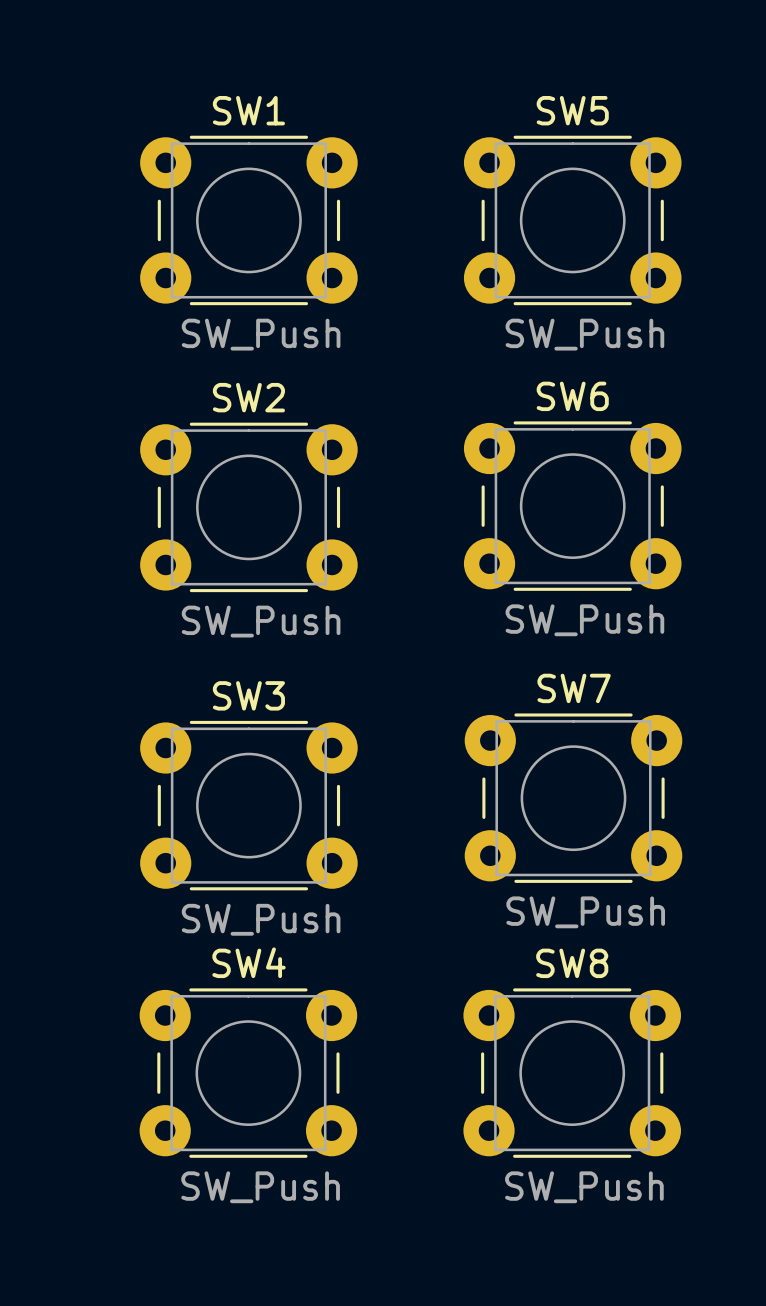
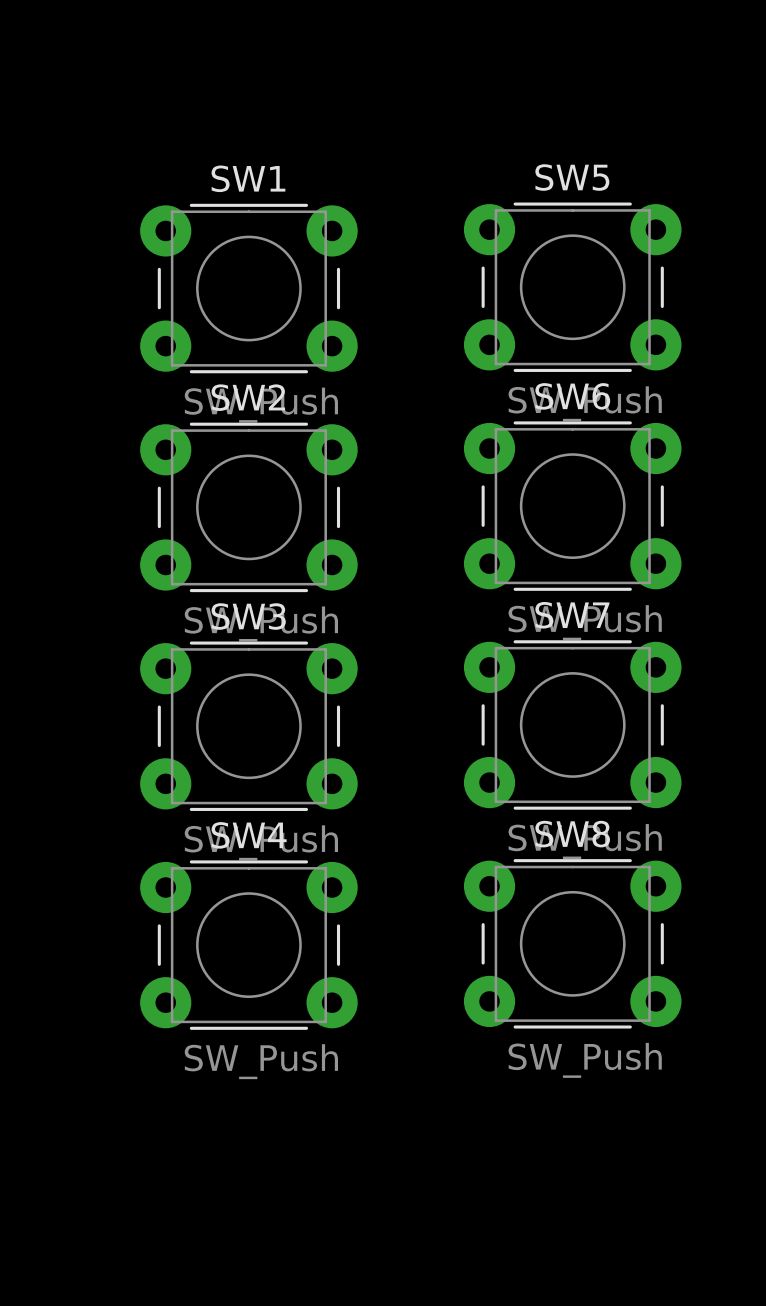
SW1 position: (248, 220) -> (248, 288)
SW5 position: (572, 220) -> (572, 287)
SW7 position: (573, 798) -> (572, 724)
SW3 position: (248, 805) -> (248, 726)
SW4 position: (248, 1073) -> (248, 945)
SW8 position: (572, 1073) -> (572, 943)

